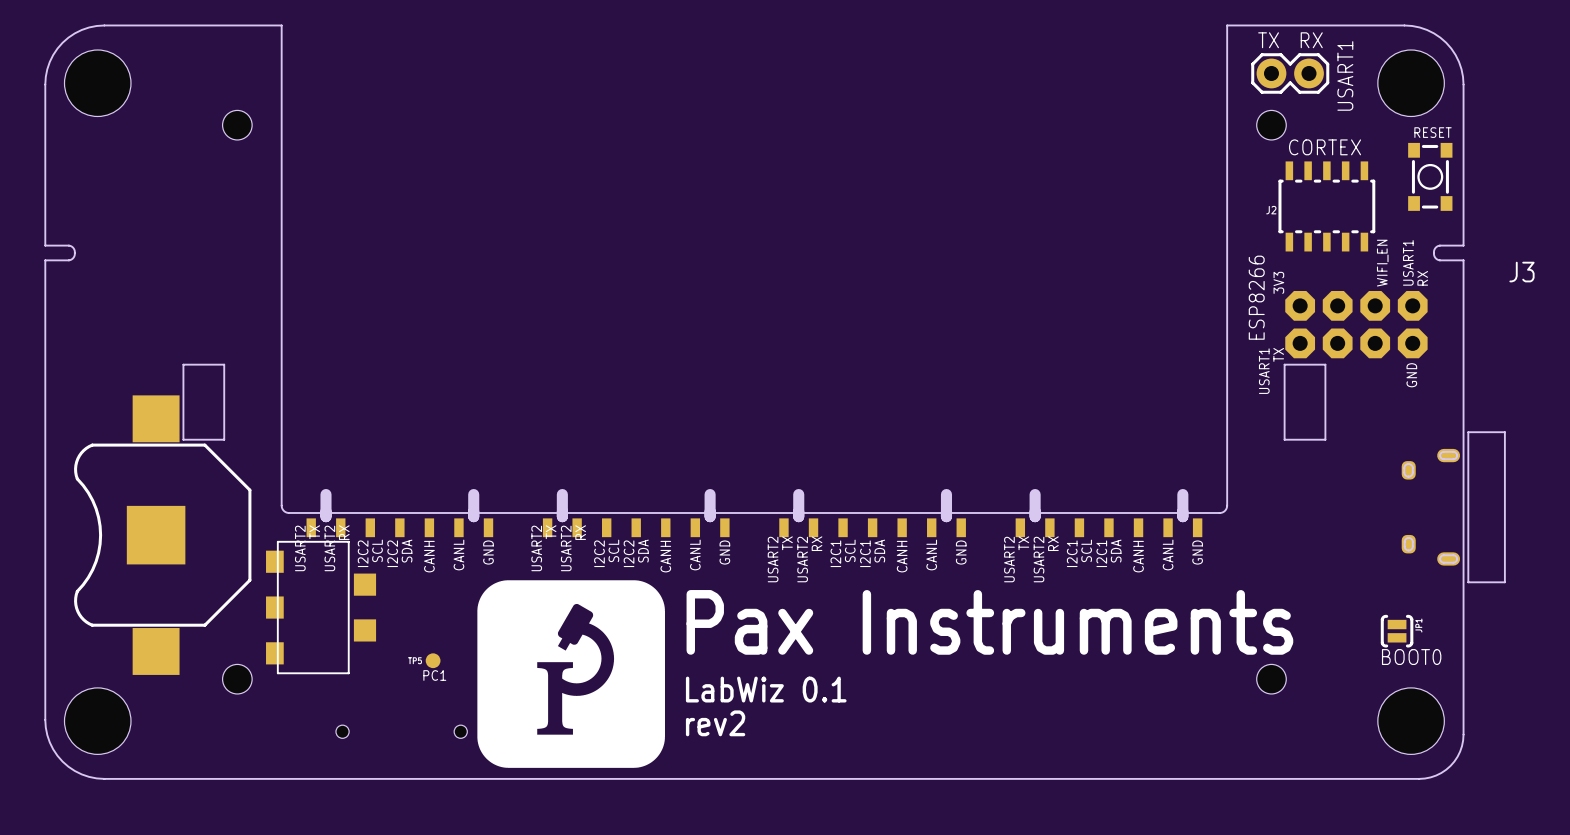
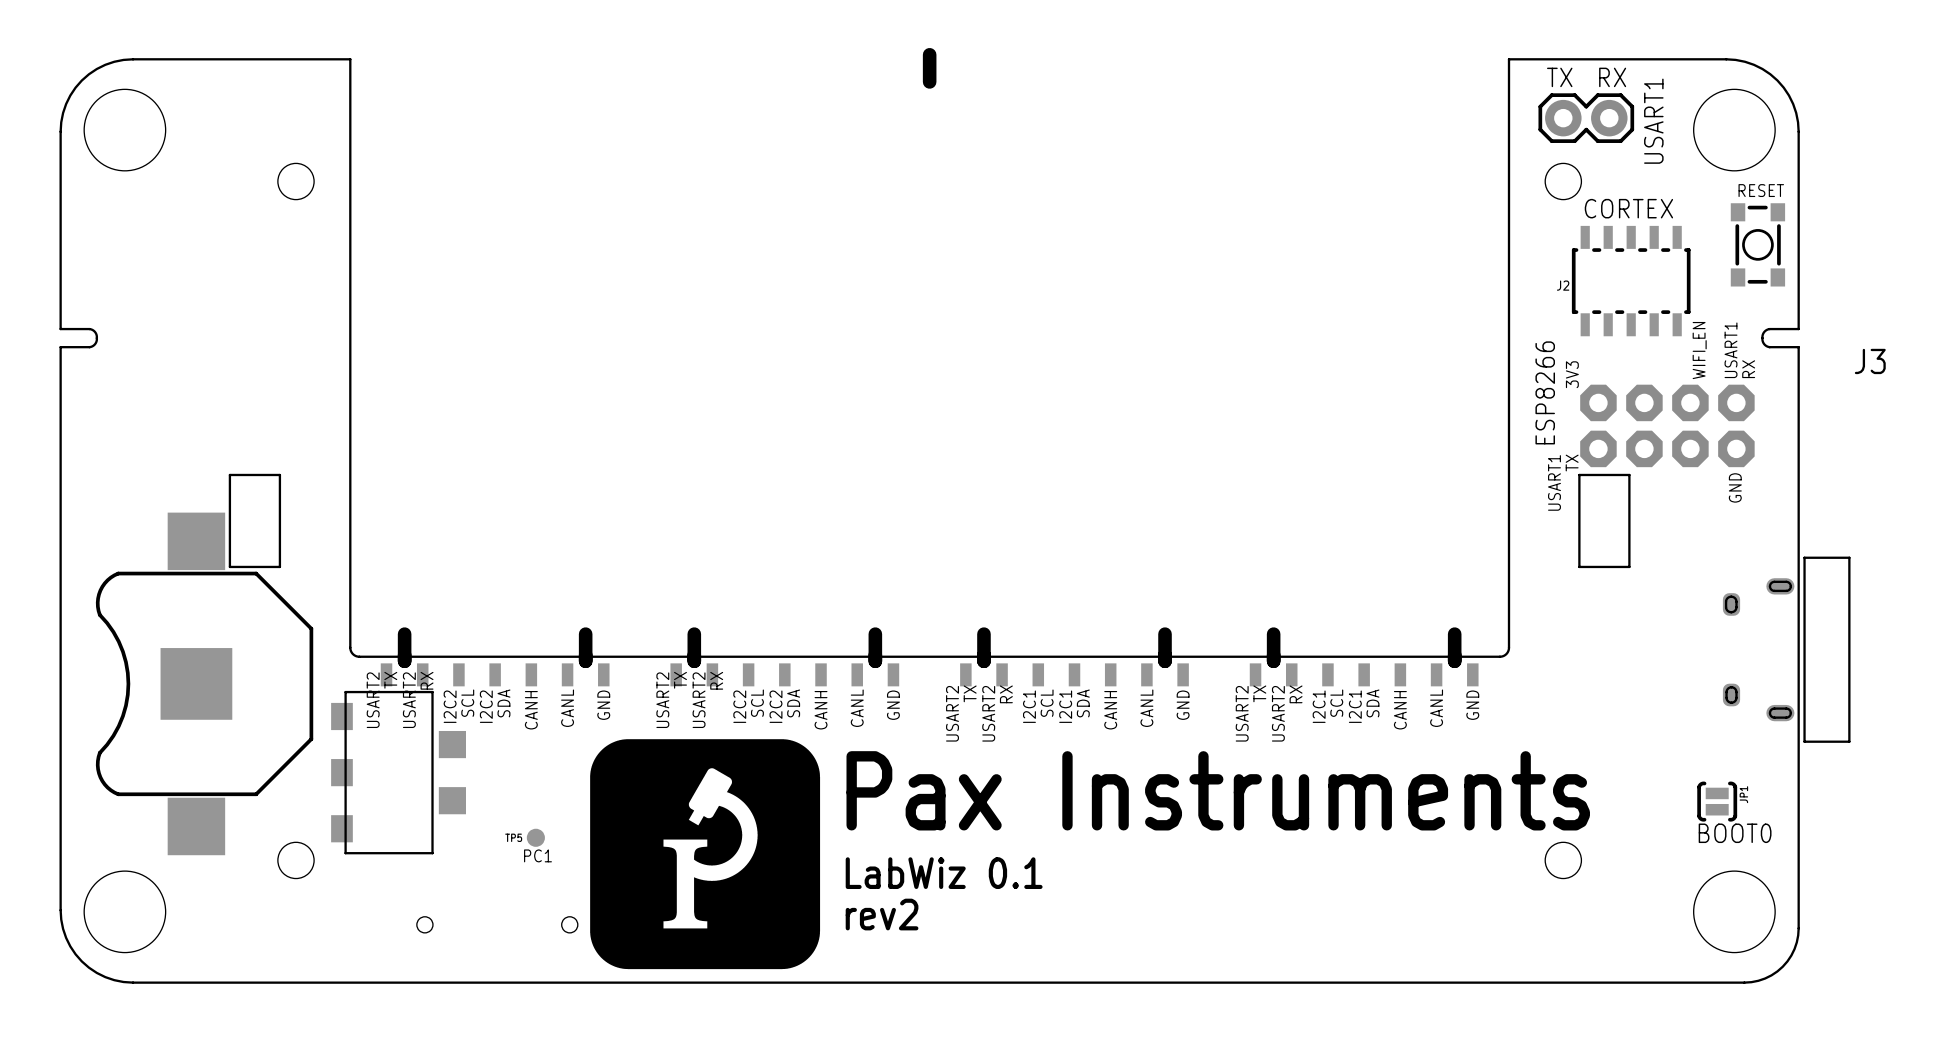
board edge: none -> (929, 54) (929, 81)

